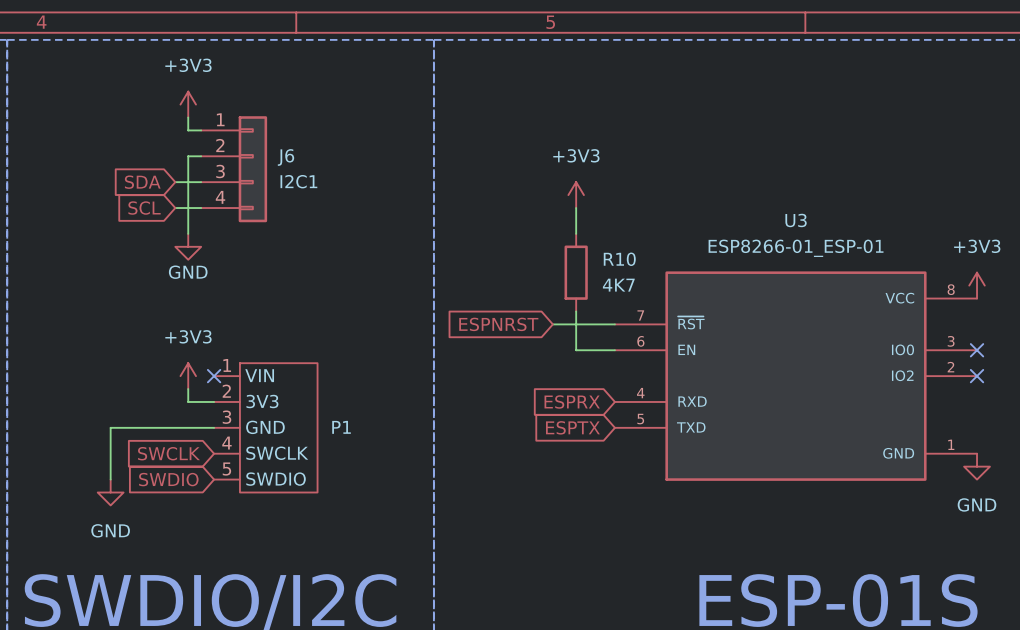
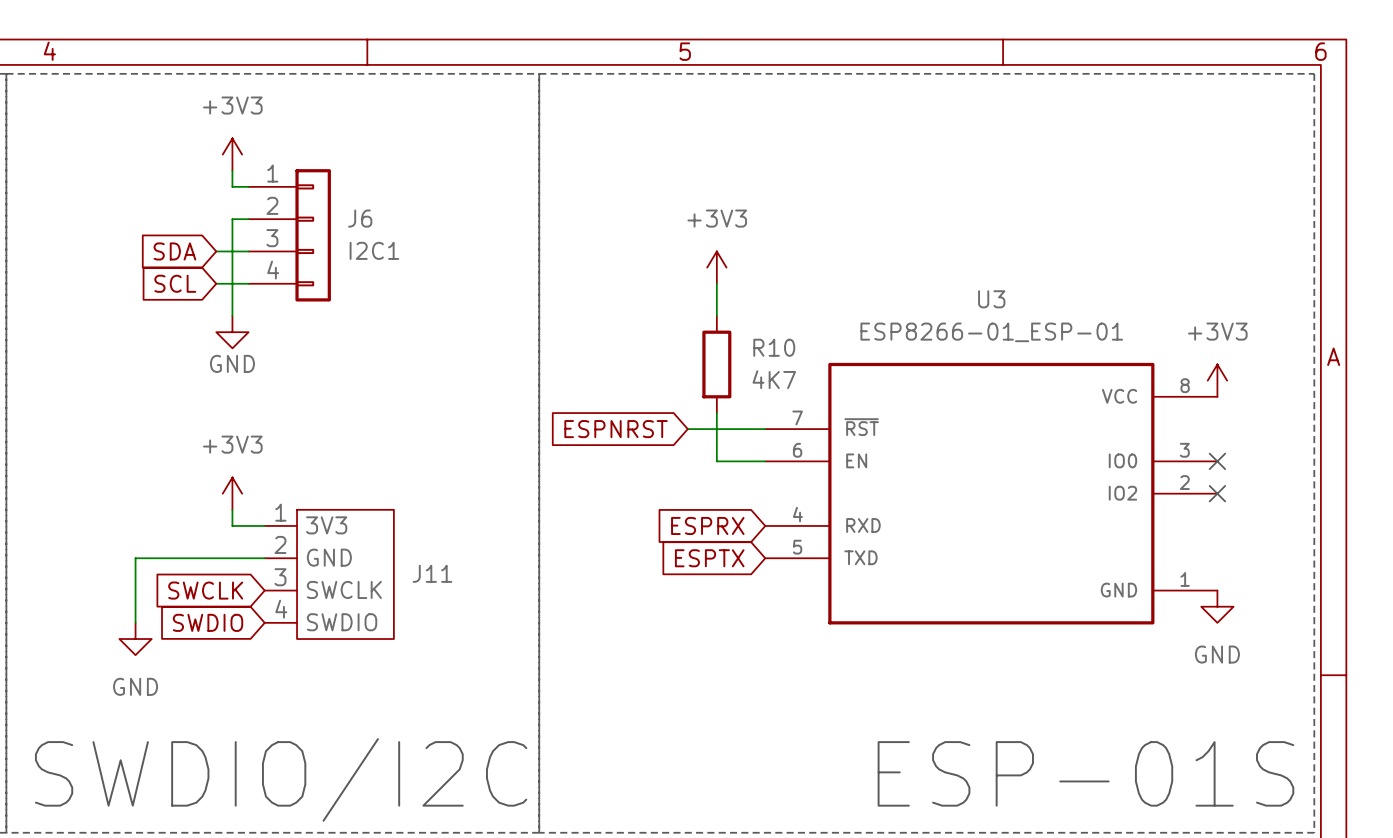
no-connect mark: (214, 376) -> none
P1: (265, 427) -> none
J11: none -> (329, 574)

